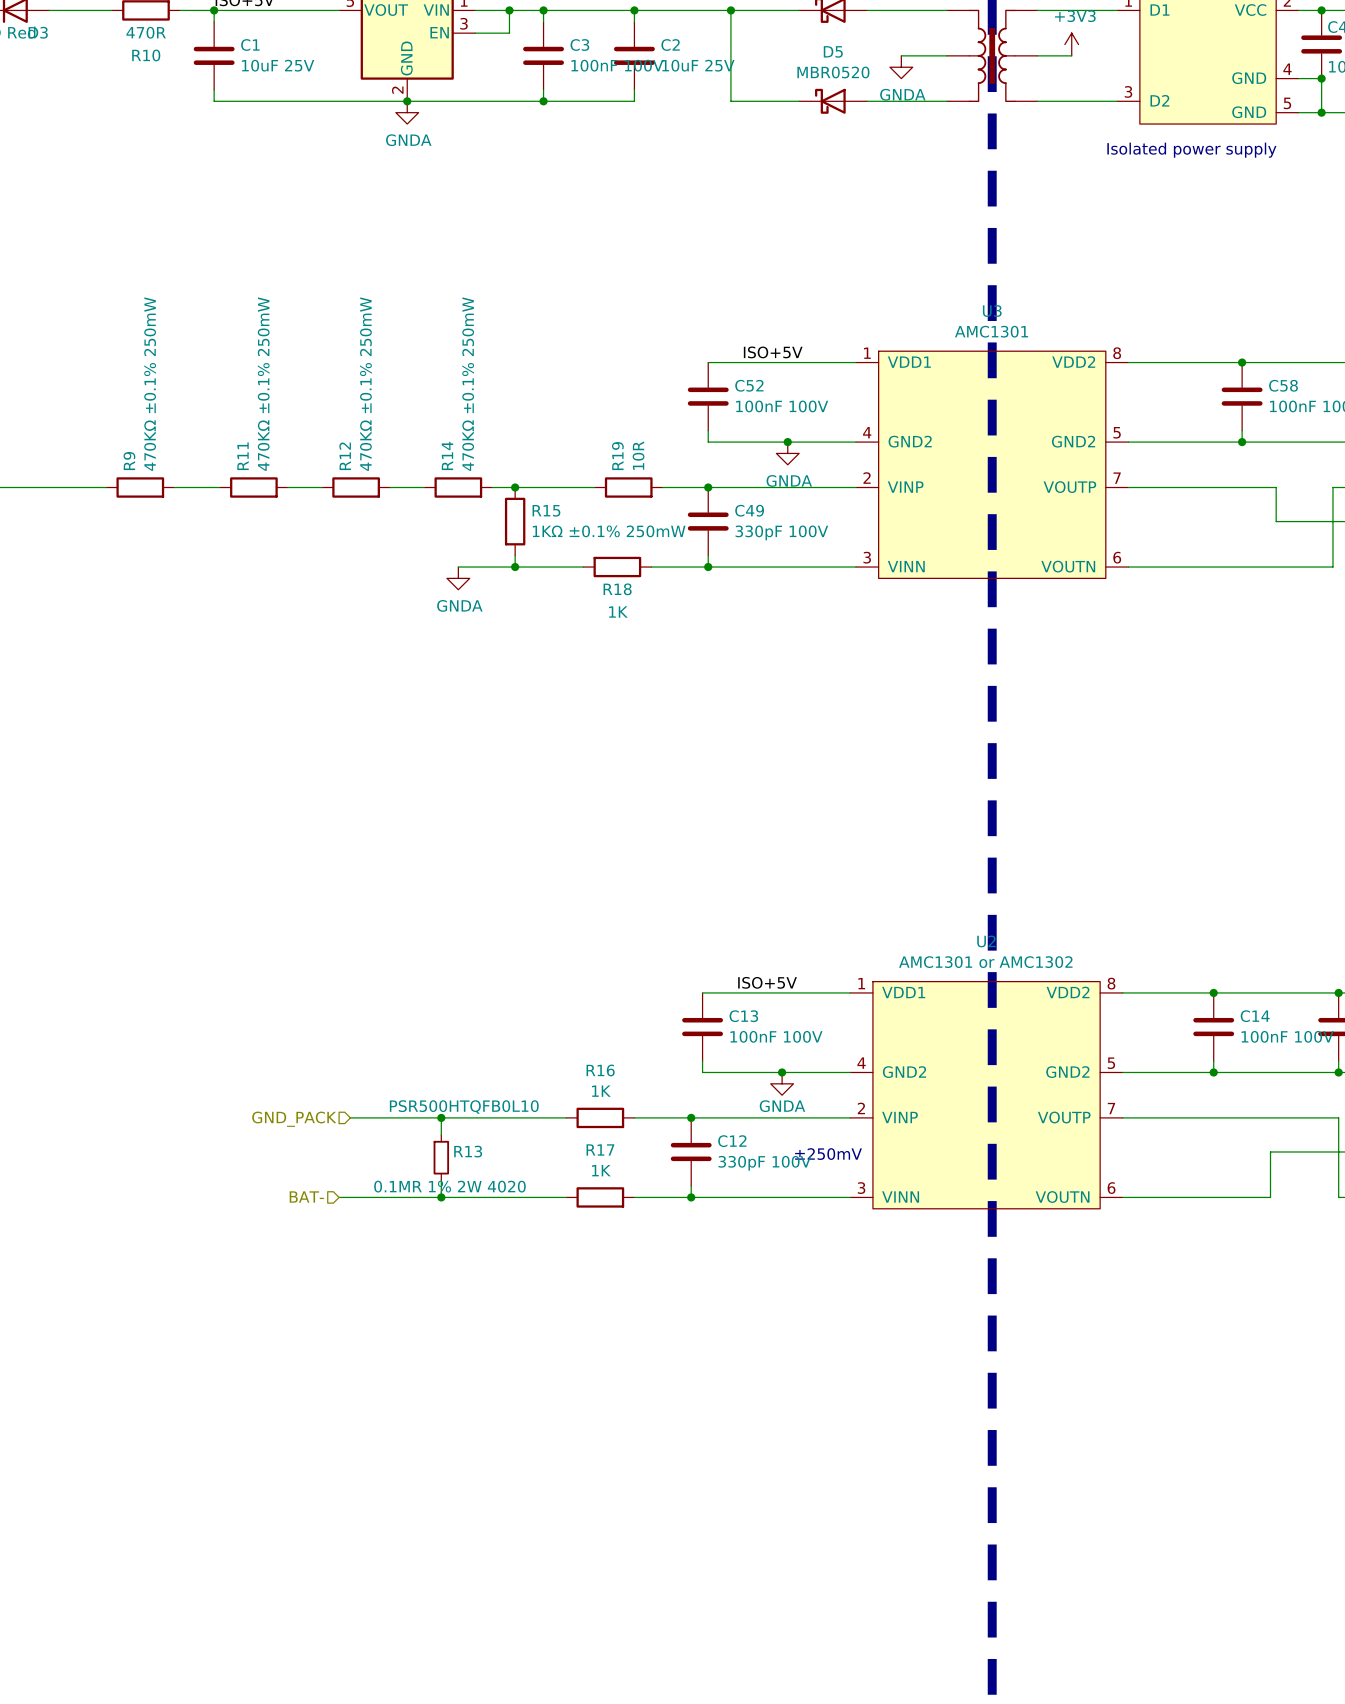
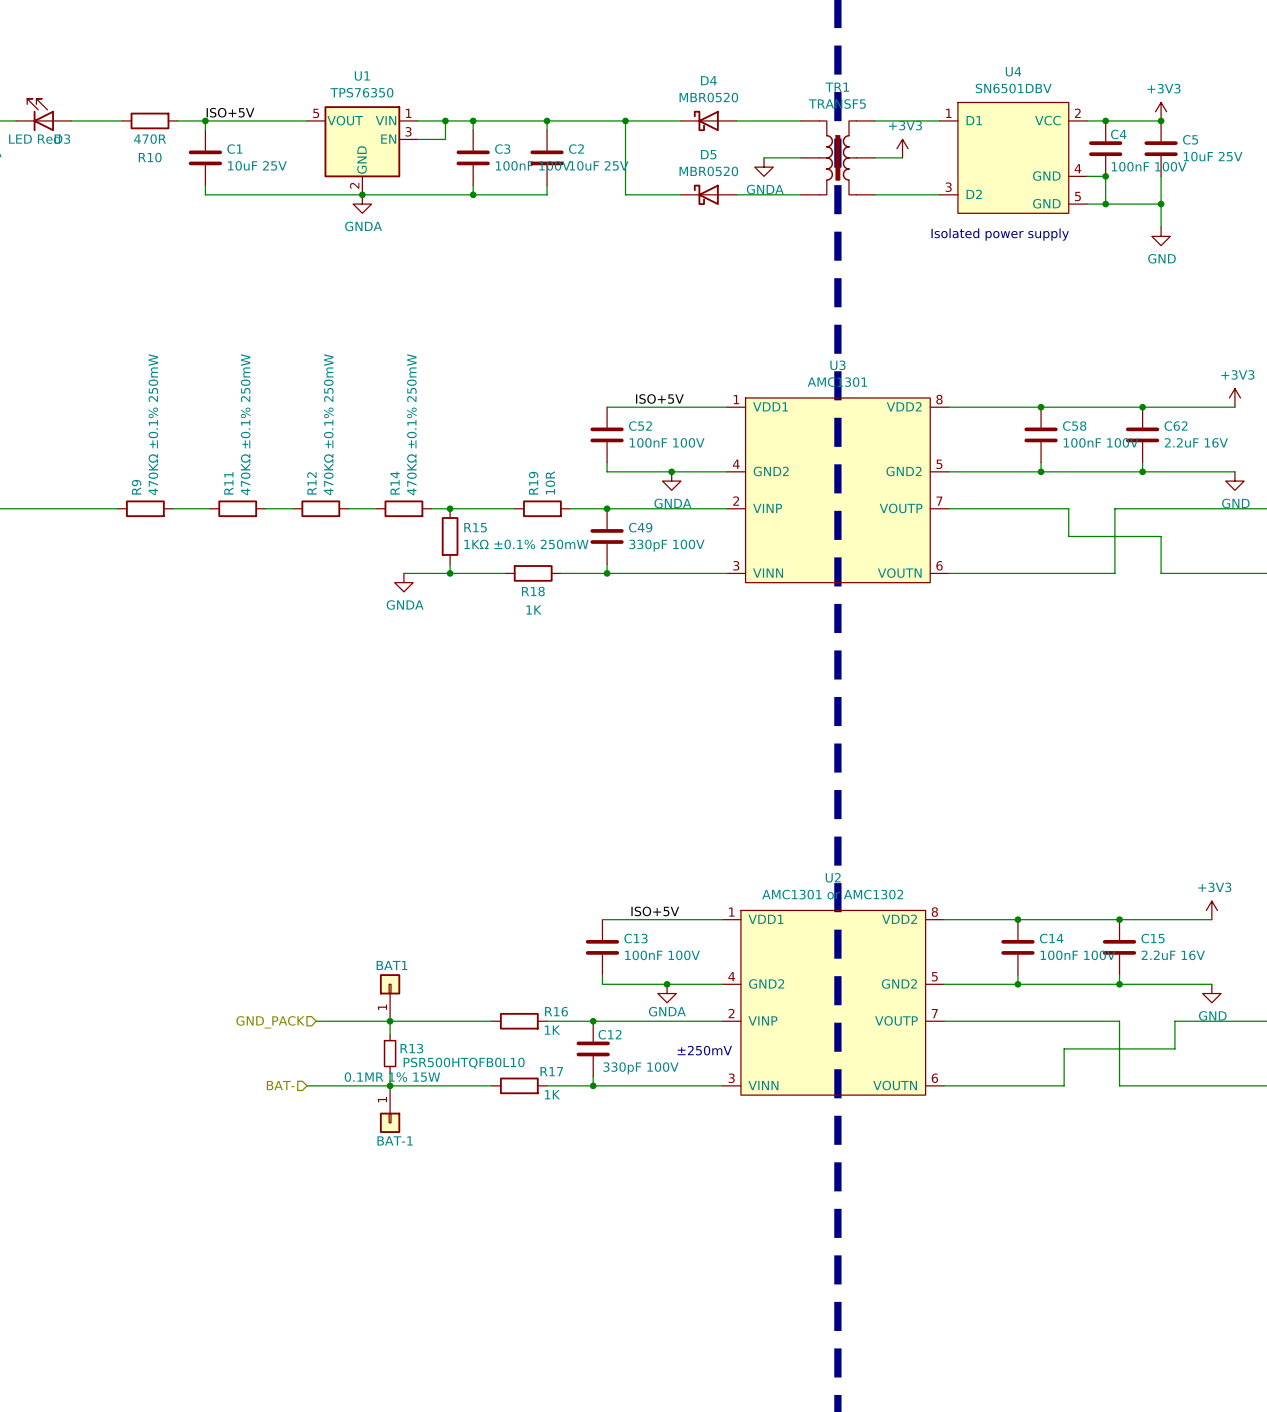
R16 name position: R16 (600, 1070) -> R16 (556, 1011)
BAT1: none -> (390, 997)
R16 value position: 1K (601, 1091) -> 1K (552, 1030)
R13 text position: PSR500HTQFB0L10 (464, 1107) -> PSR500HTQFB0L10 (464, 1063)
C12 name position: C12 (732, 1141) -> C12 (610, 1034)
R17 name position: R17 (600, 1149) -> R17 (551, 1071)
C12 value position: 330pF 100V (764, 1163) -> 330pF 100V (641, 1068)
R17 value position: 1K (601, 1170) -> 1K (552, 1094)
R13 value: 0.1MR 1% 2W 4020 (449, 1186) -> 0.1MR 1% 15W (392, 1077)
BAT-1: none -> (390, 1109)

